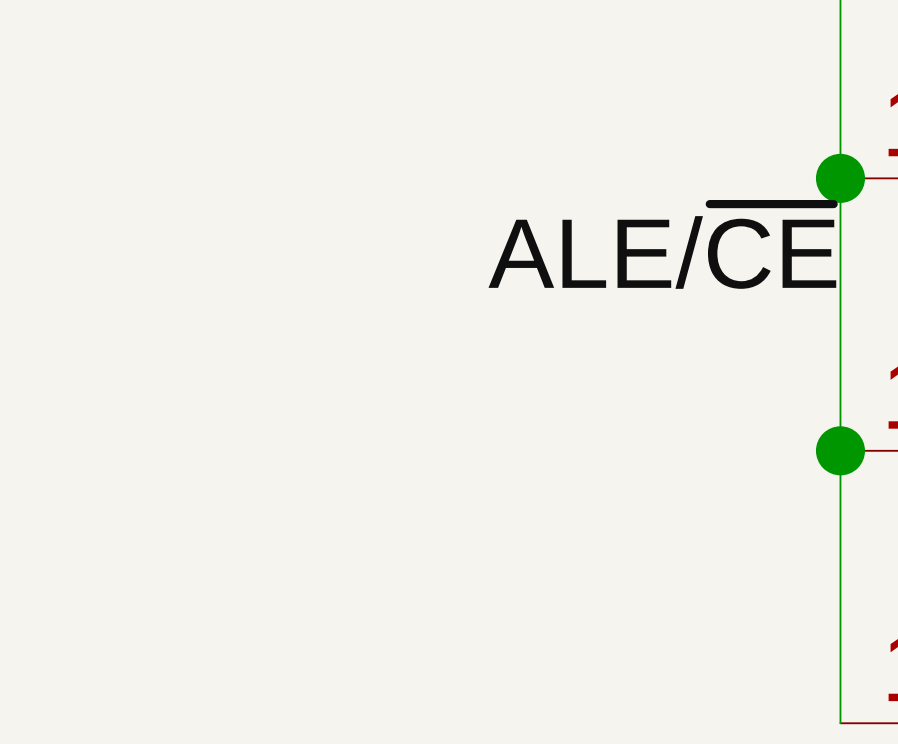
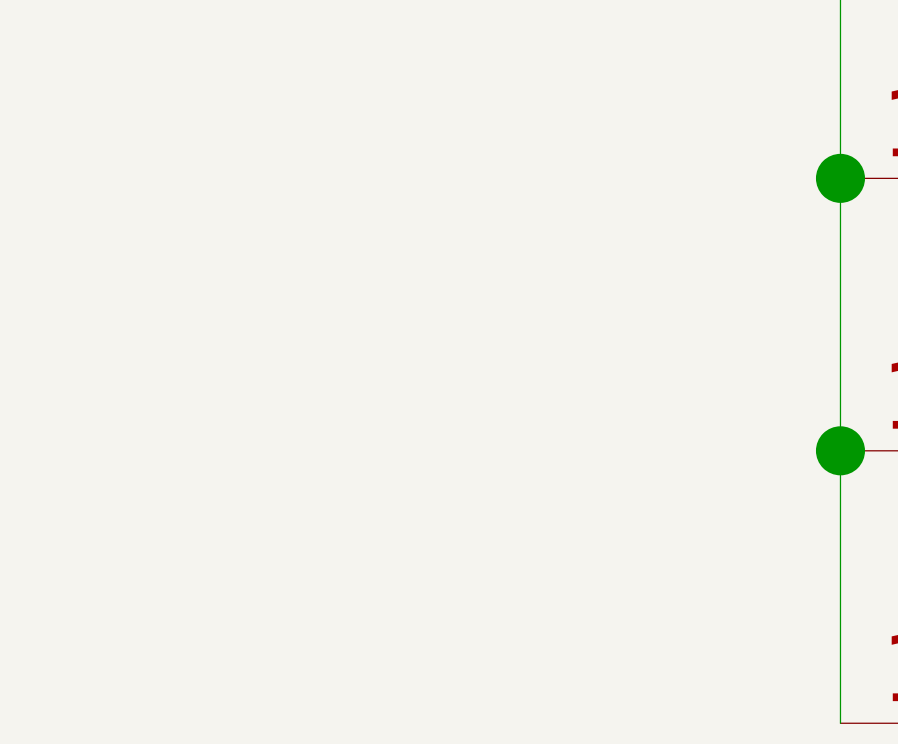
label: ALE/~{CE} (662, 246) -> none

